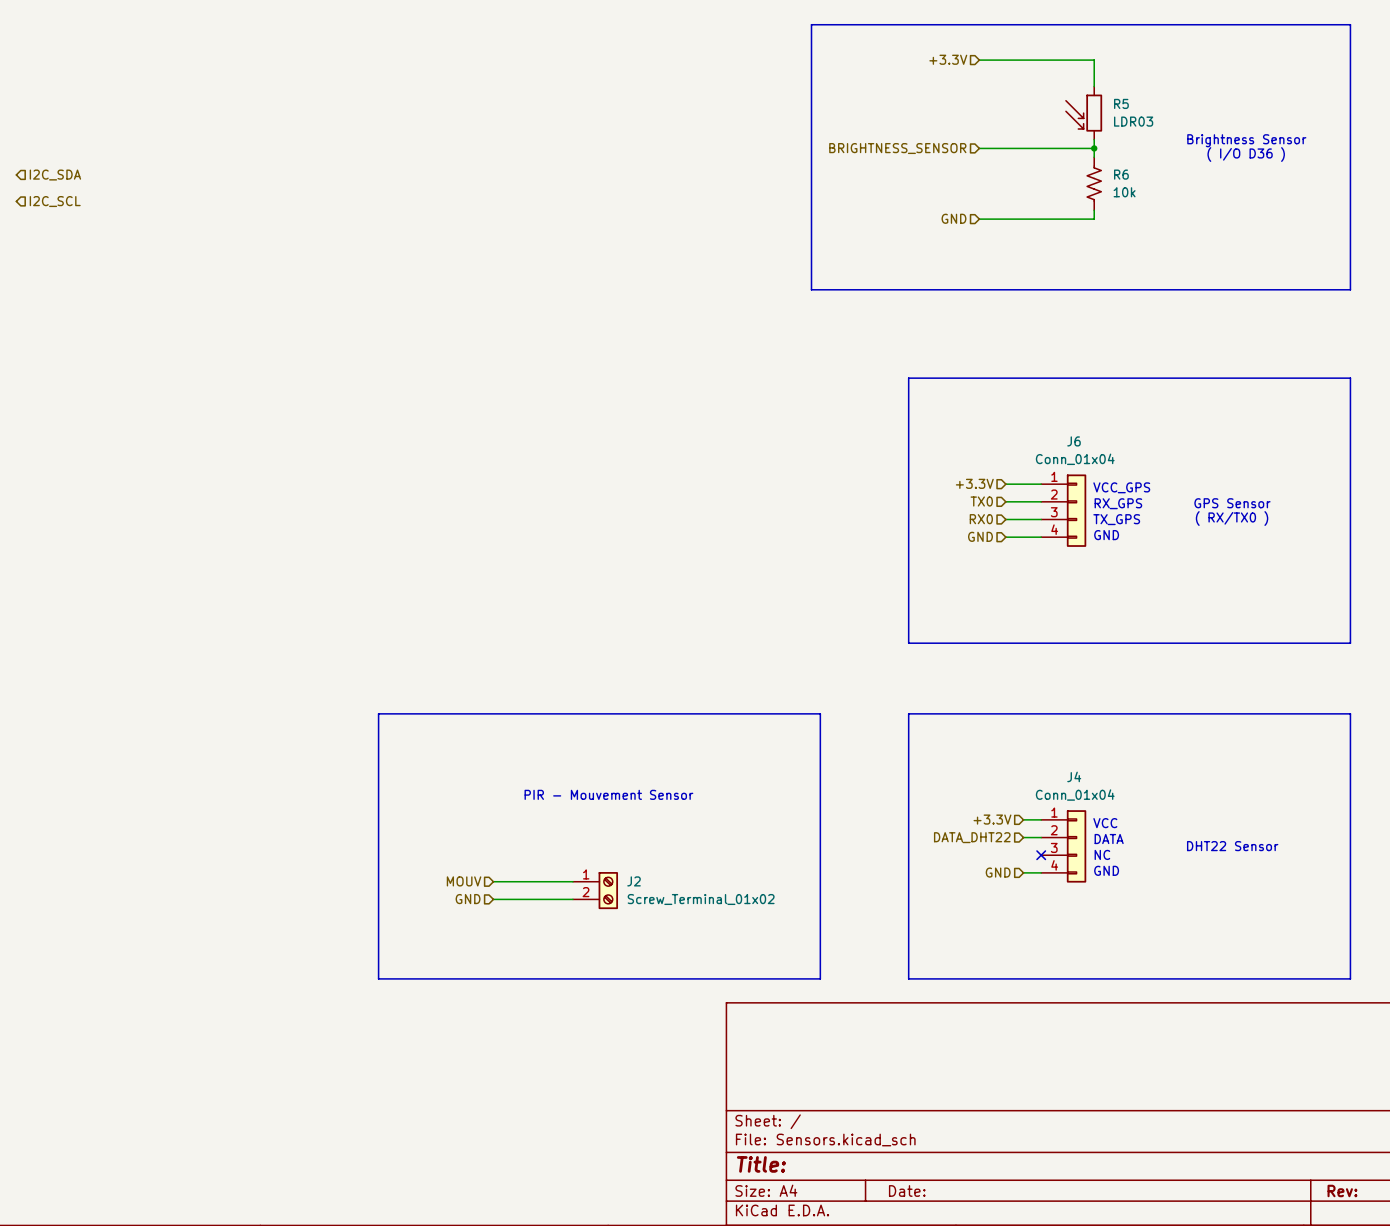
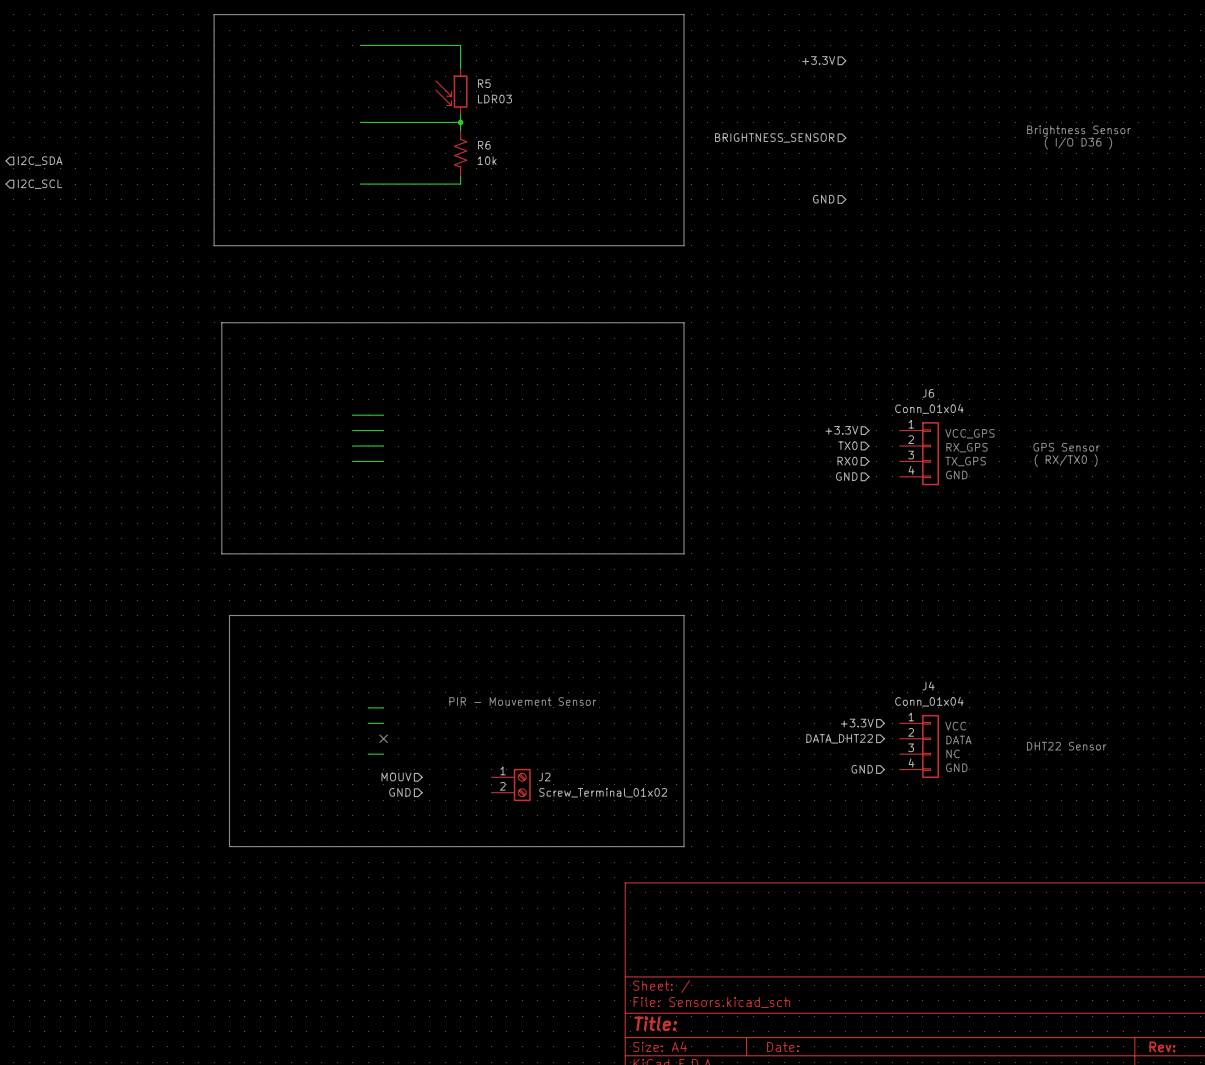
line: none -> (214, 14) (684, 14) (684, 245) (214, 245) (214, 14)
line: (811, 24) (1350, 24) (1350, 289) (811, 289) (811, 24) -> none
wire: none -> (360, 45) (460, 45) (460, 68)
wire: (979, 60) (1094, 60) (1094, 86) -> none
R5 position: (1084, 113) -> (451, 91)
wire: none -> (460, 114) (460, 130)
wire: none -> (360, 122) (460, 122)
junction: none -> (460, 122)
wire: (1094, 139) (1094, 157) -> none
wire: (979, 148) (1094, 148) -> none
junction: (1094, 148) -> none
R6 position: (1094, 183) -> (460, 153)
wire: none -> (460, 176) (460, 184) (360, 184)
wire: (1094, 210) (1094, 219) (979, 219) -> none
line: none -> (221, 322) (684, 322) (684, 553) (221, 553) (221, 322)
line: (908, 378) (908, 643) (1350, 643) (1350, 378) (908, 378) -> none
wire: none -> (352, 415) (383, 415)
wire: none -> (352, 430) (383, 430)
wire: (1005, 484) (1041, 484) -> none
wire: none -> (352, 446) (383, 446)
wire: (1005, 501) (1041, 501) -> none
wire: none -> (352, 461) (383, 461)
wire: (1005, 519) (1041, 519) -> none
wire: (1005, 537) (1041, 537) -> none
line: (378, 713) (820, 713) (820, 978) (378, 978) (378, 713) -> (229, 615) (229, 846) (684, 846) (684, 615) (229, 615)
line: (908, 713) (1350, 713) (1350, 978) (908, 978) (908, 713) -> none
wire: none -> (368, 707) (383, 707)
wire: none -> (368, 723) (383, 723)
wire: (1023, 819) (1041, 819) -> none
no-connect mark: none -> (383, 738)
wire: (1023, 837) (1041, 837) -> none
wire: none -> (368, 754) (383, 754)
no-connect mark: (1041, 855) -> none
wire: (1023, 872) (1041, 872) -> none
wire: (493, 881) (572, 881) -> none
wire: (493, 899) (572, 899) -> none

